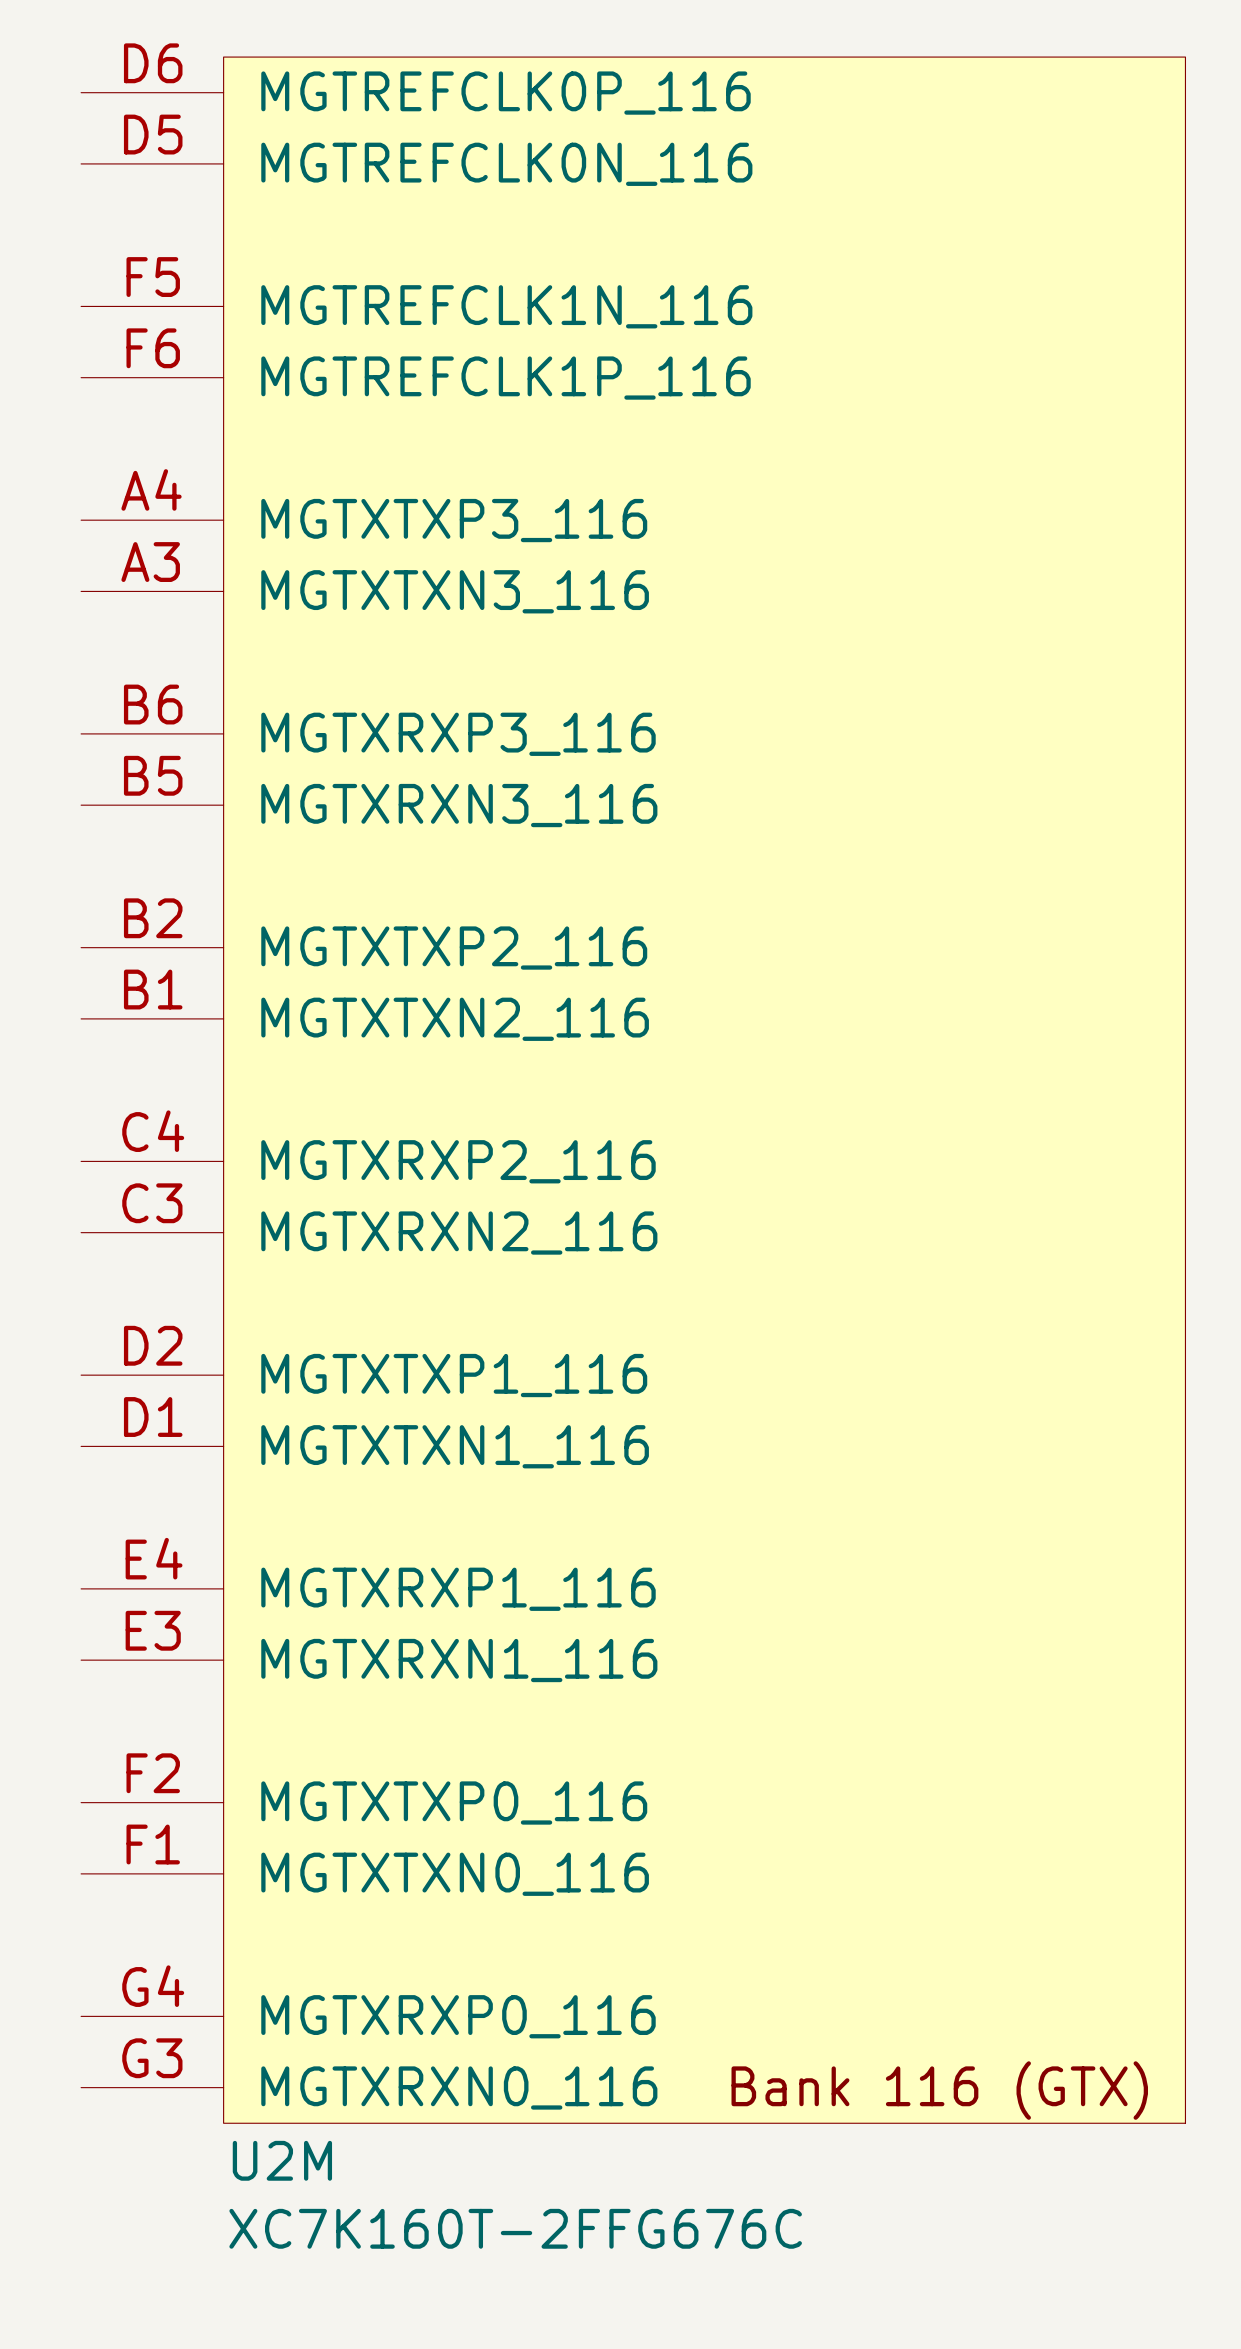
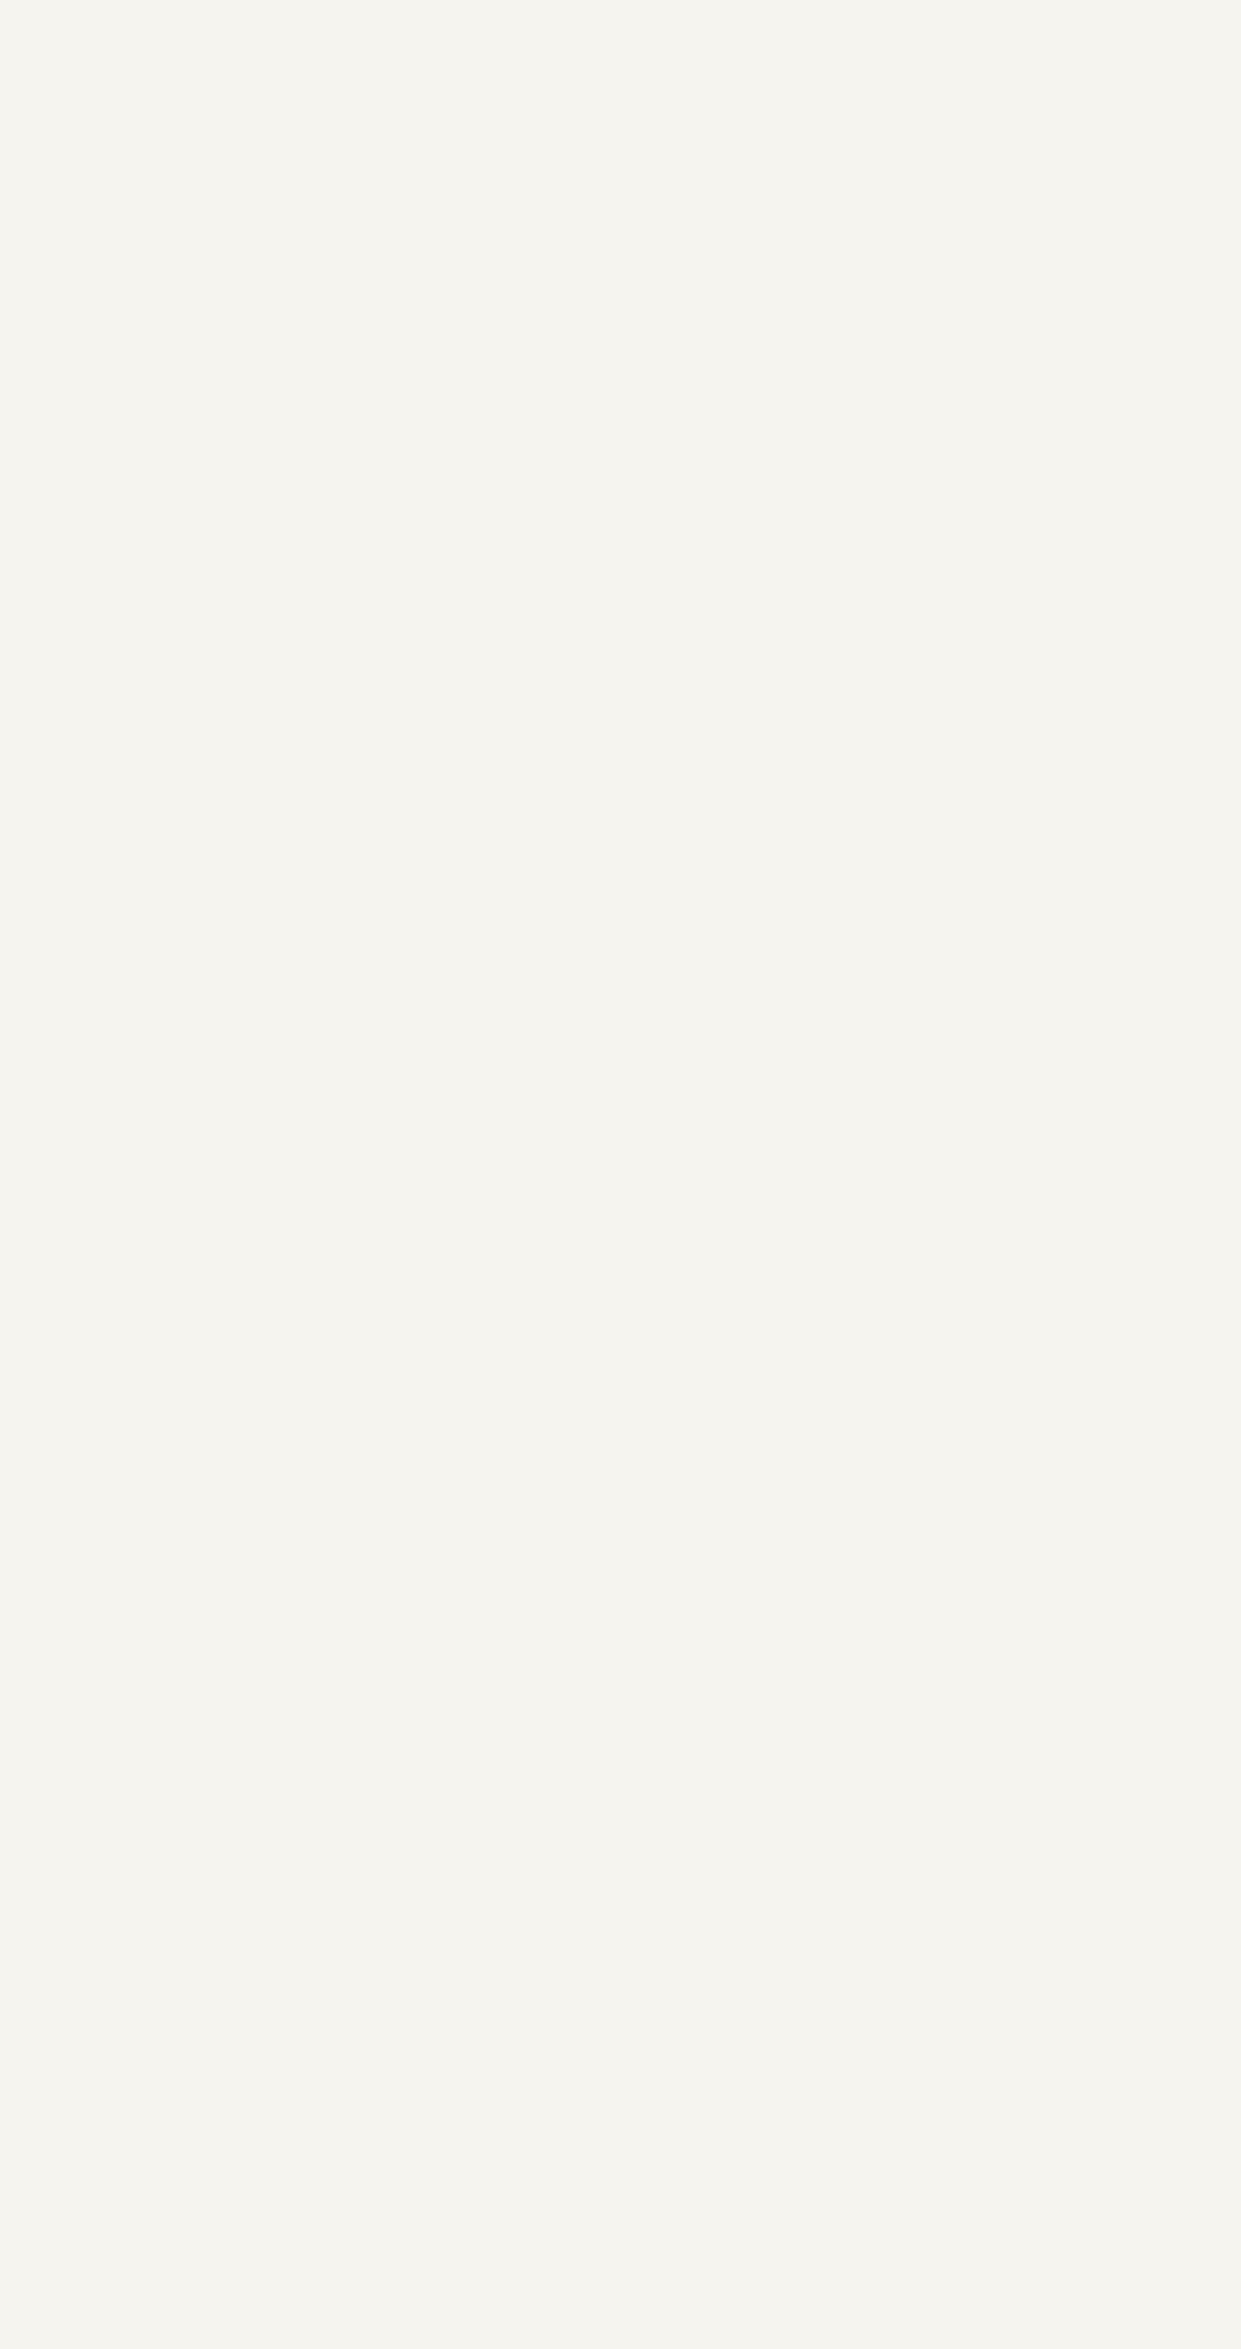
U2M: XC7K160T-2FFG676C (633, 1090) -> none

